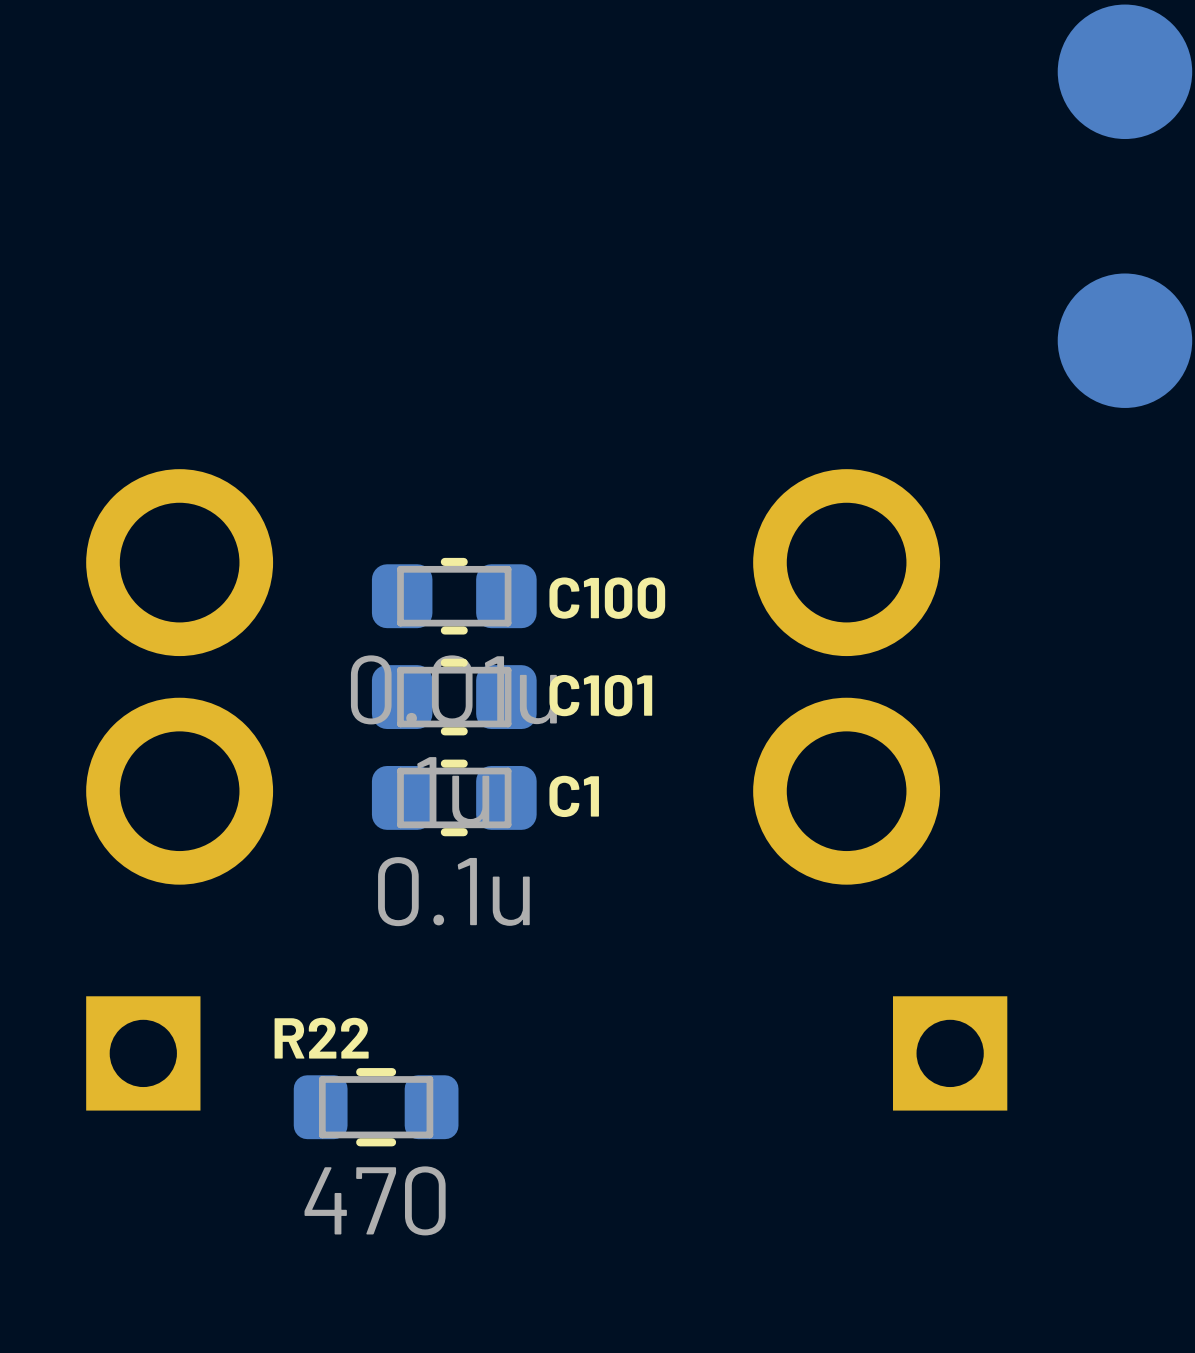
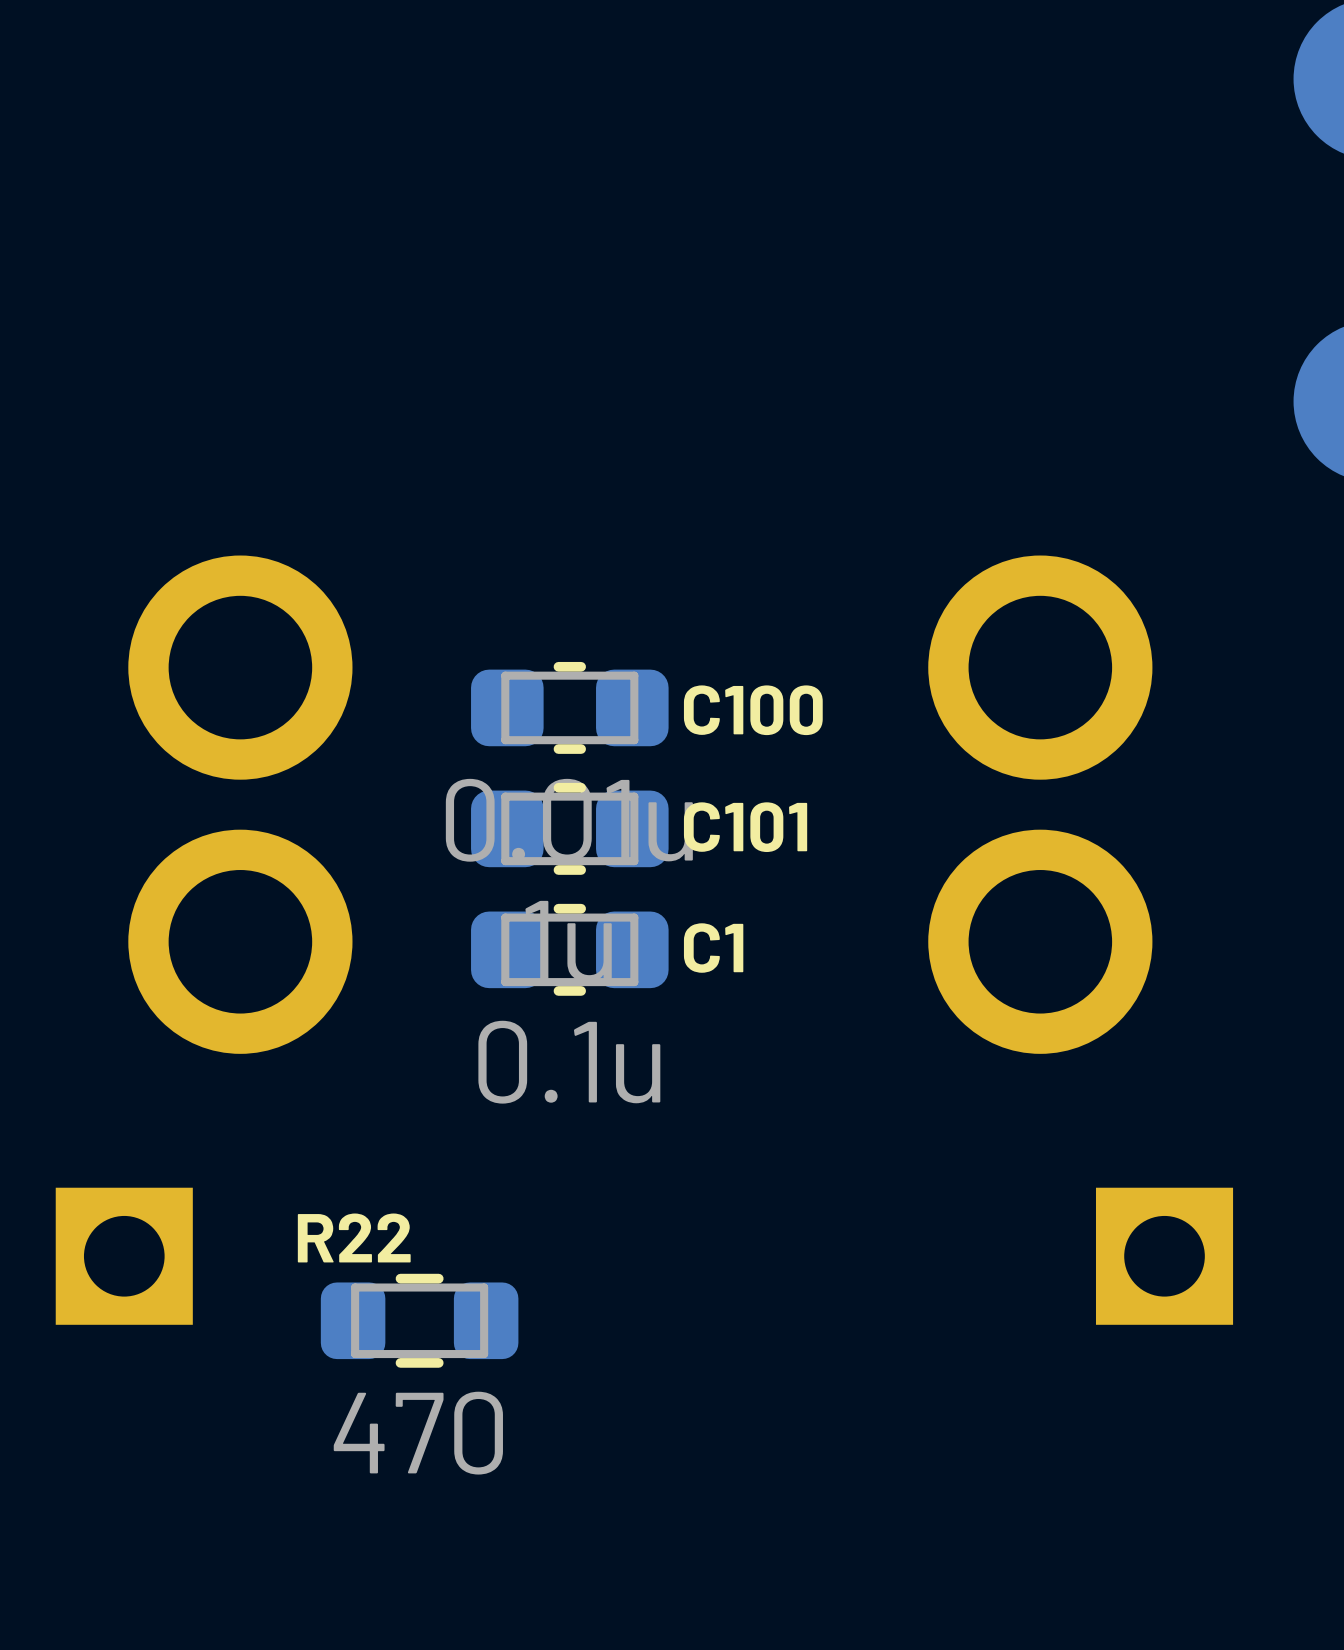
part position: (143, 1053) -> (124, 1256)
R22 position: (376, 1107) -> (419, 1320)

